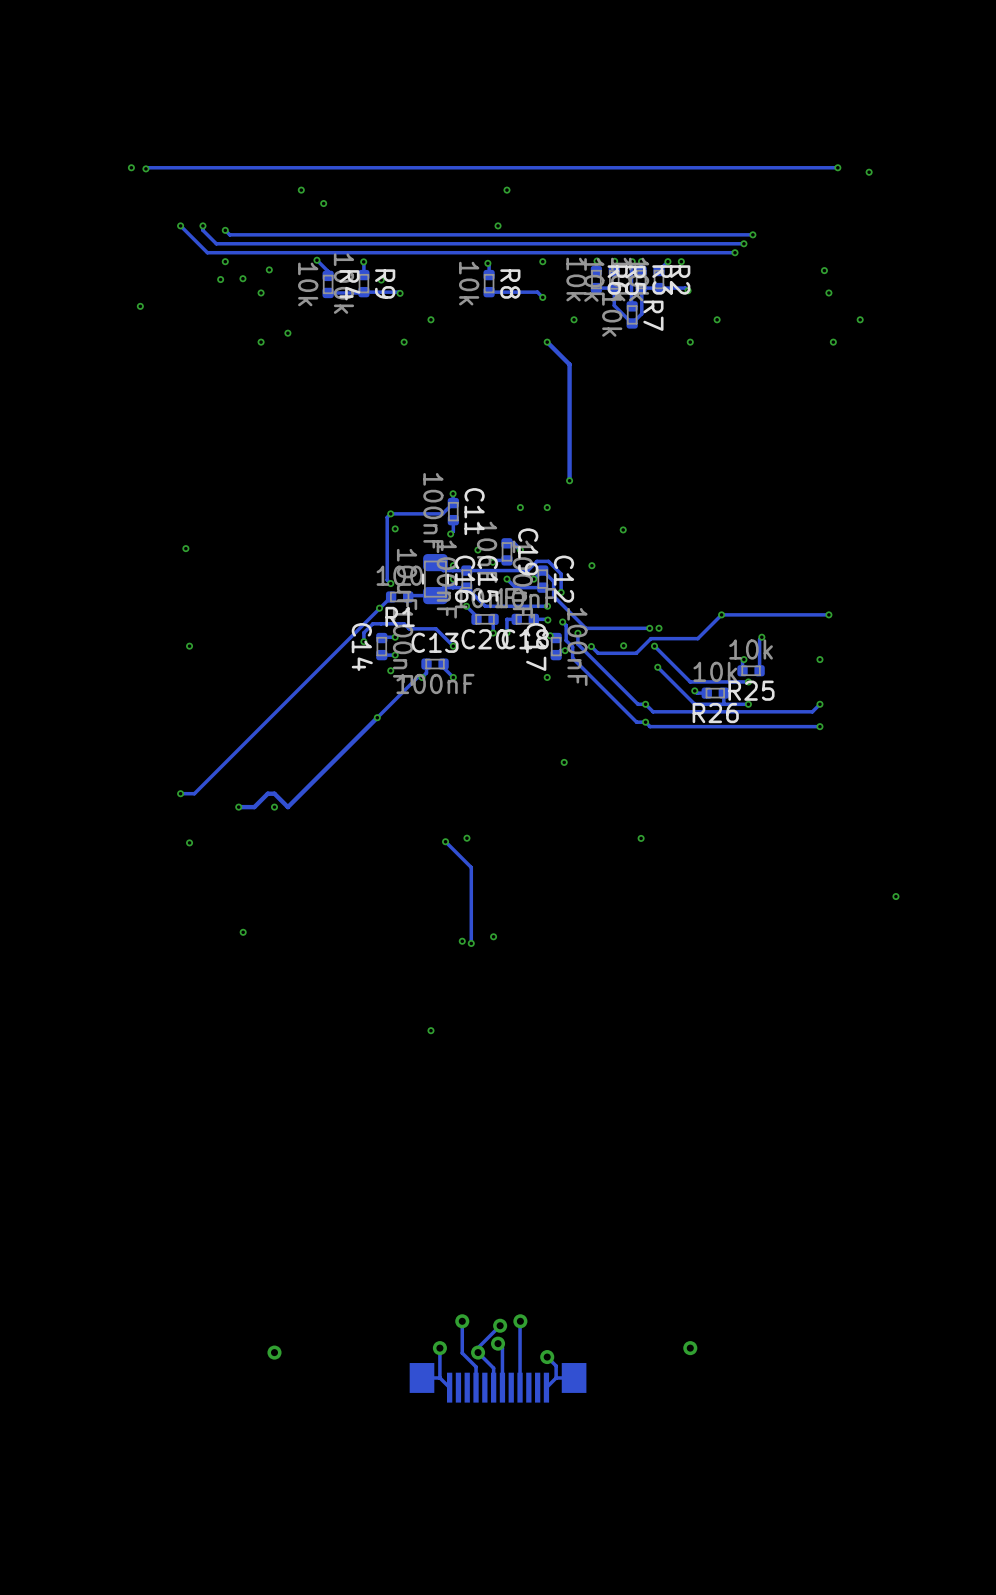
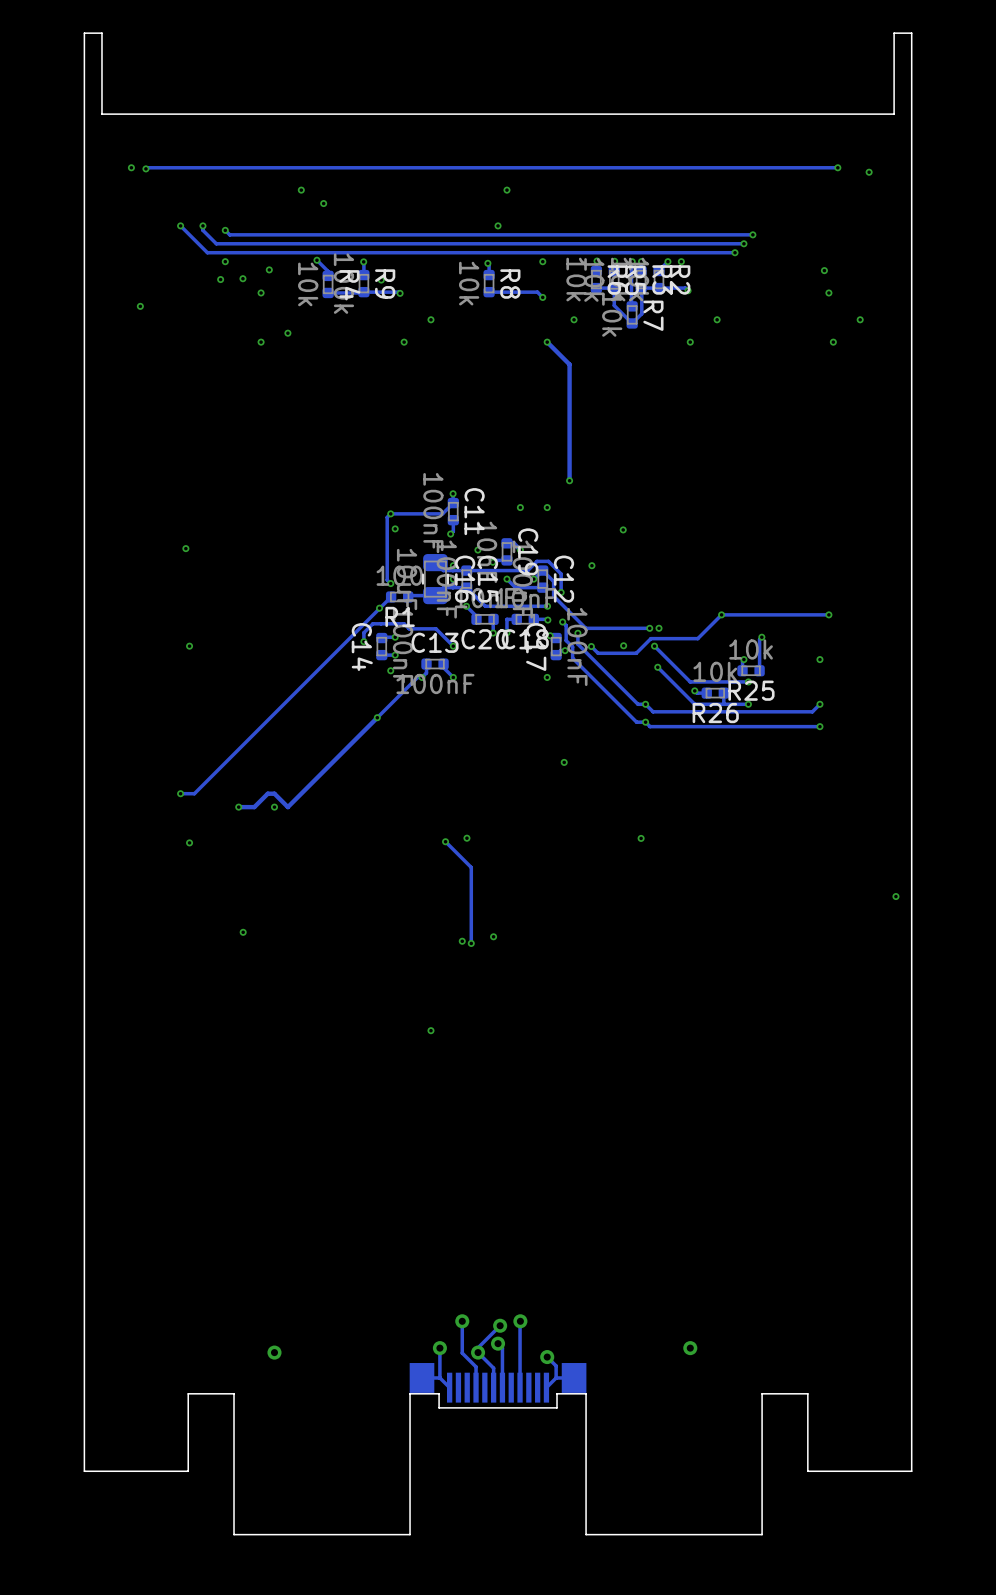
board edge: none -> (911, 33) (894, 33) (894, 114) (101, 114) (101, 33) (84, 33) (84, 1471) (188, 1471) (188, 1393) (234, 1393) (234, 1534) (410, 1534) (410, 1393) (439, 1393) (439, 1407) (557, 1407) (557, 1393) (586, 1393) (586, 1534) (762, 1534) (762, 1393) (807, 1393) (807, 1471) (911, 1471) (911, 33)

